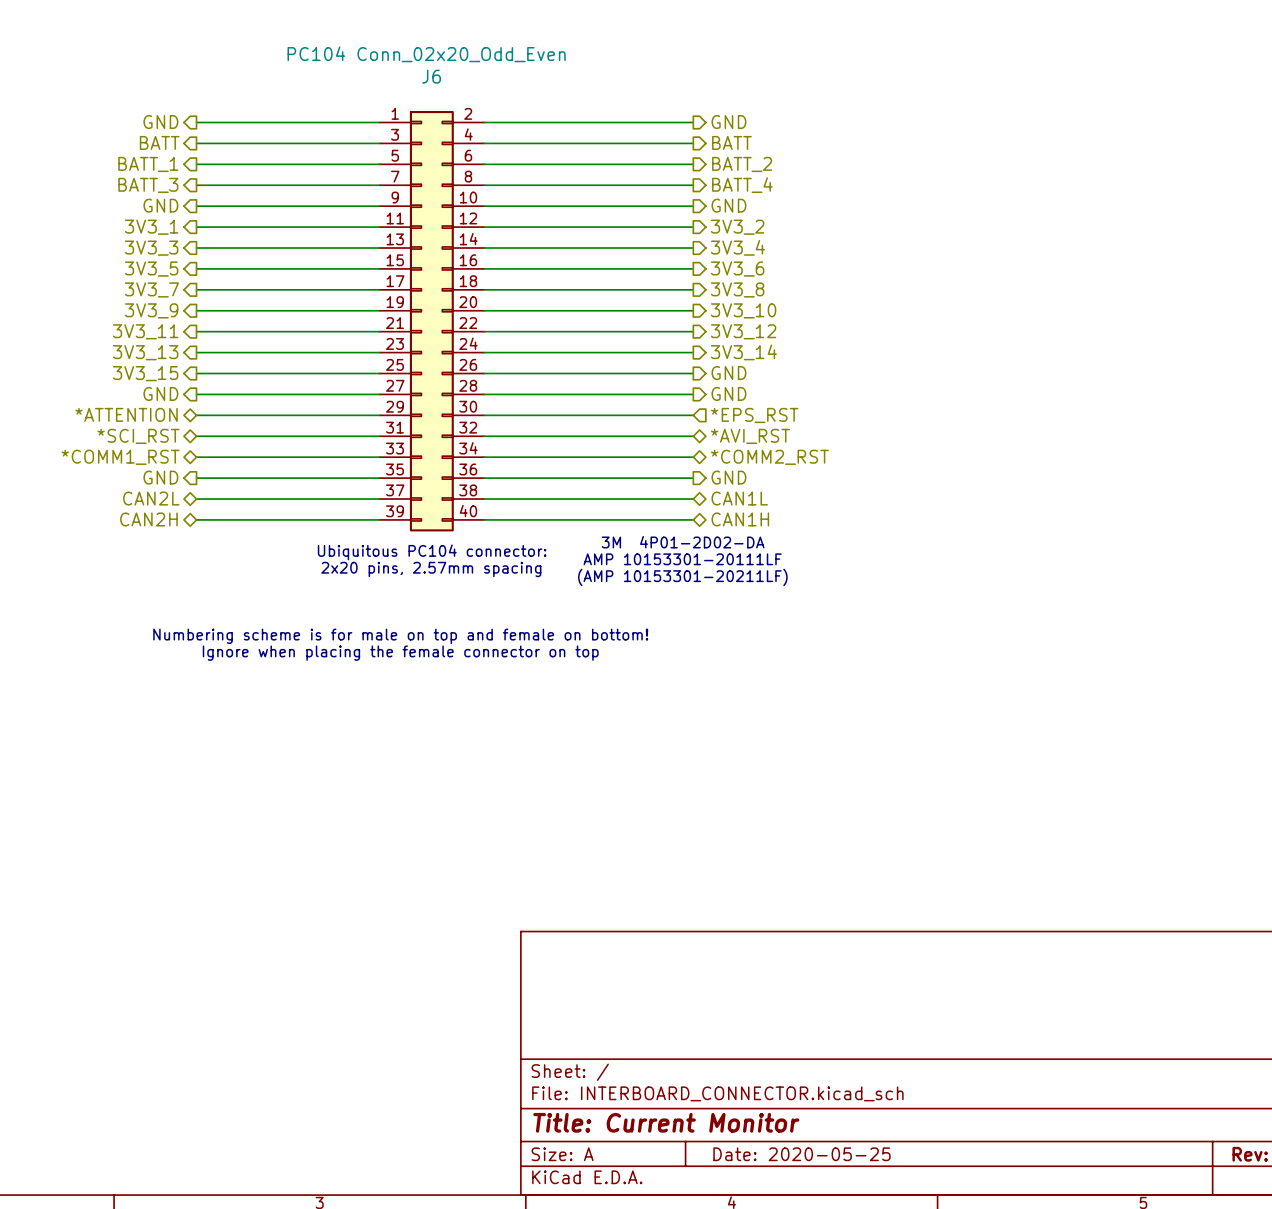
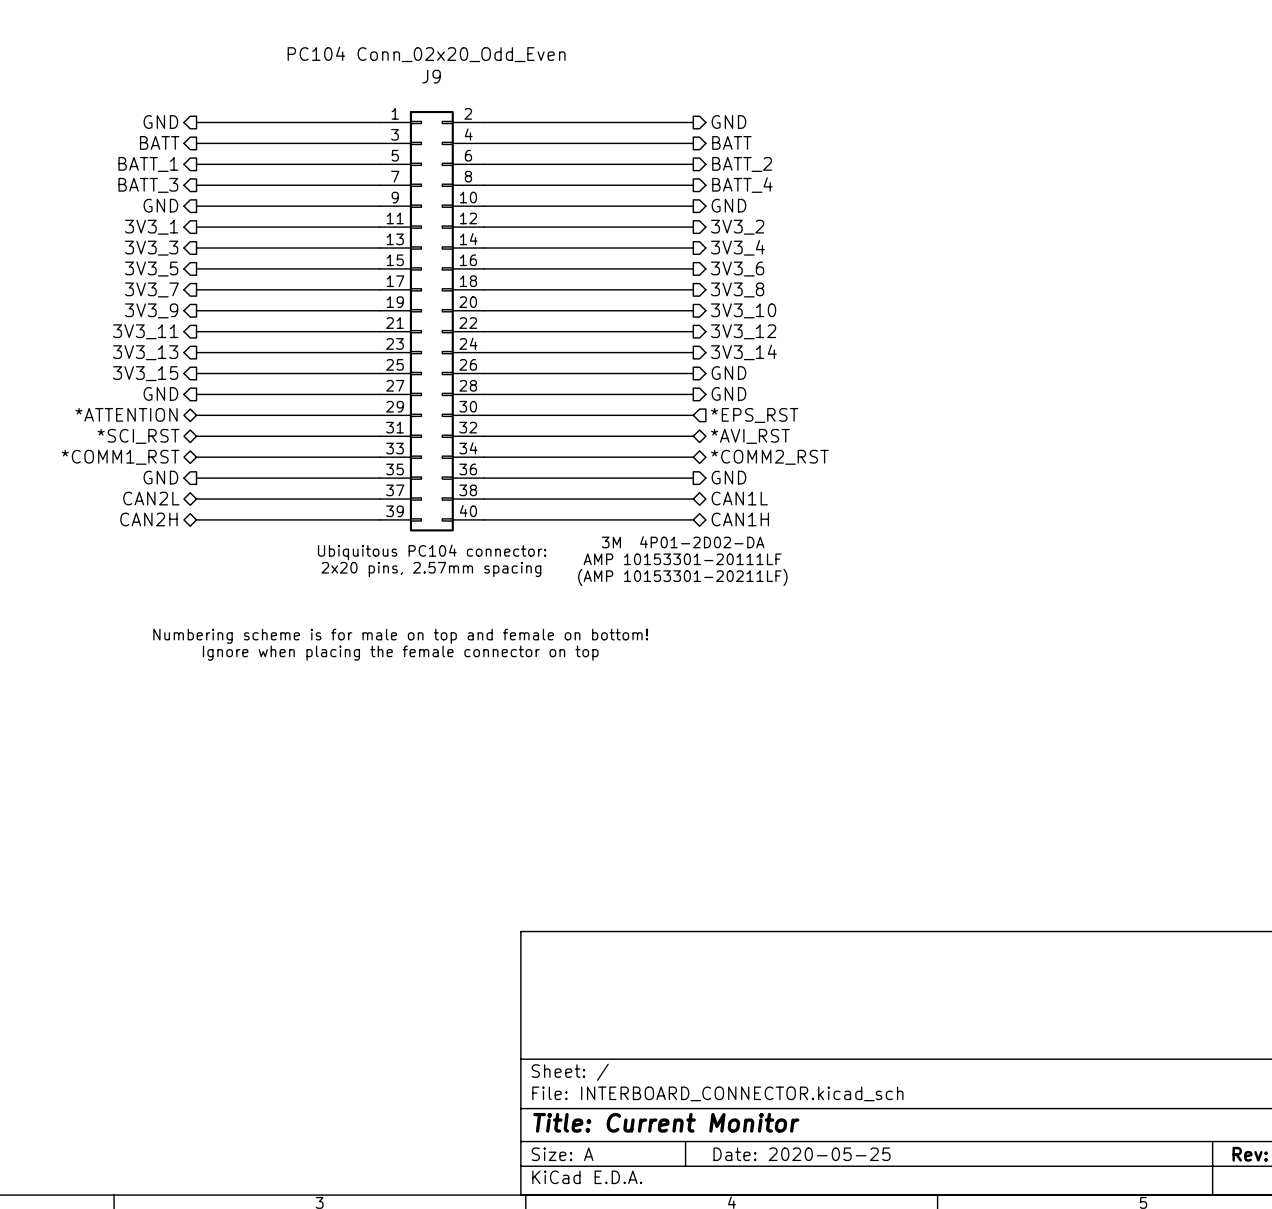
J6 name: J6 (431, 76) -> J9 (431, 76)

